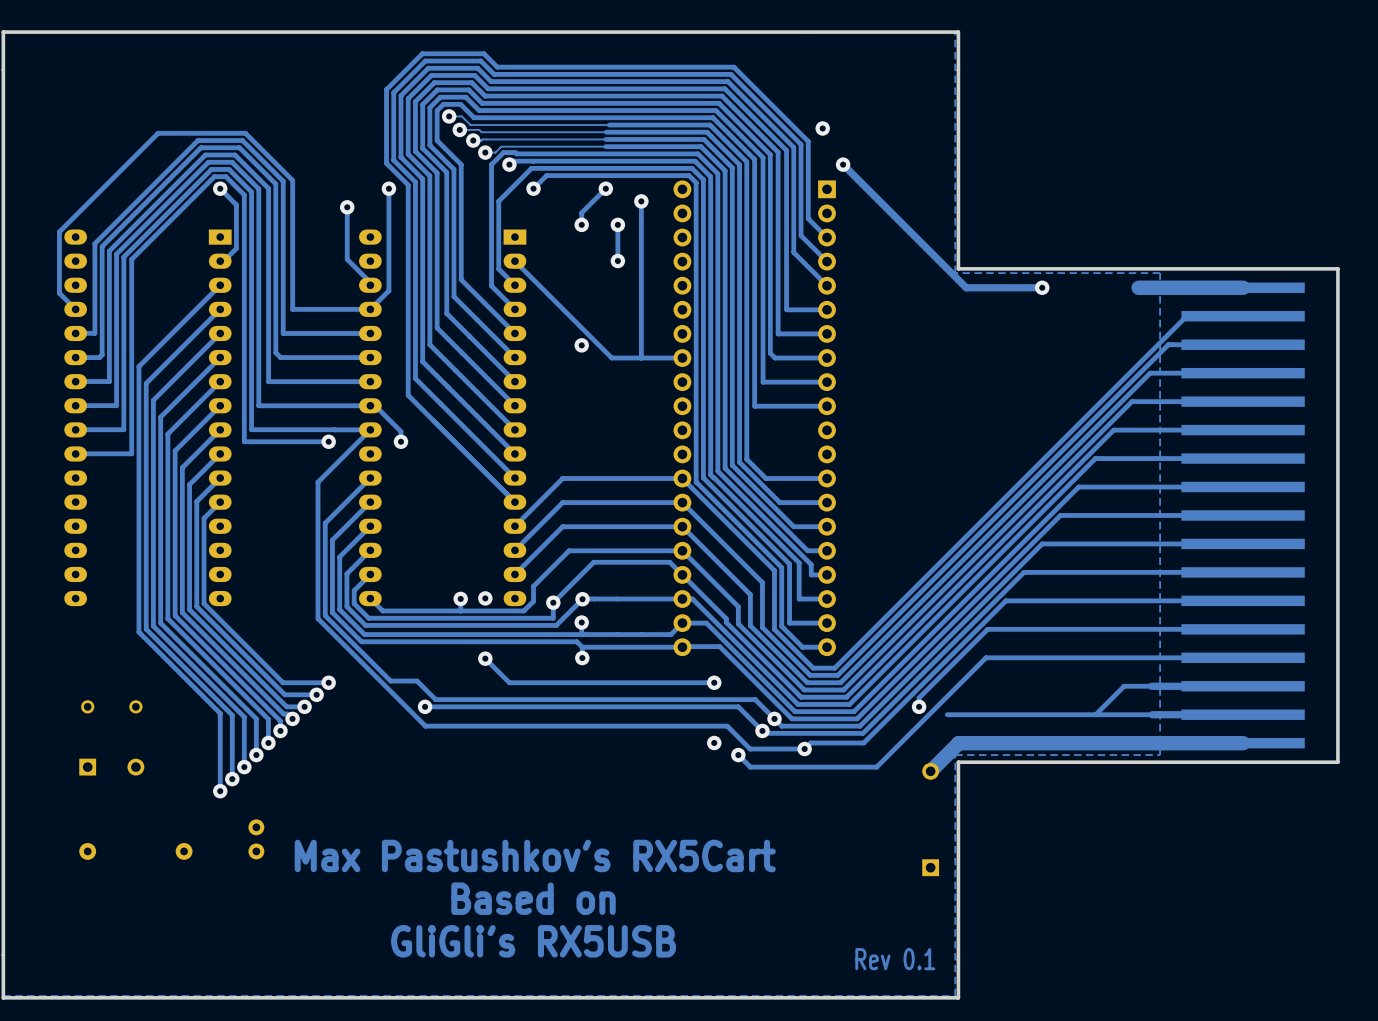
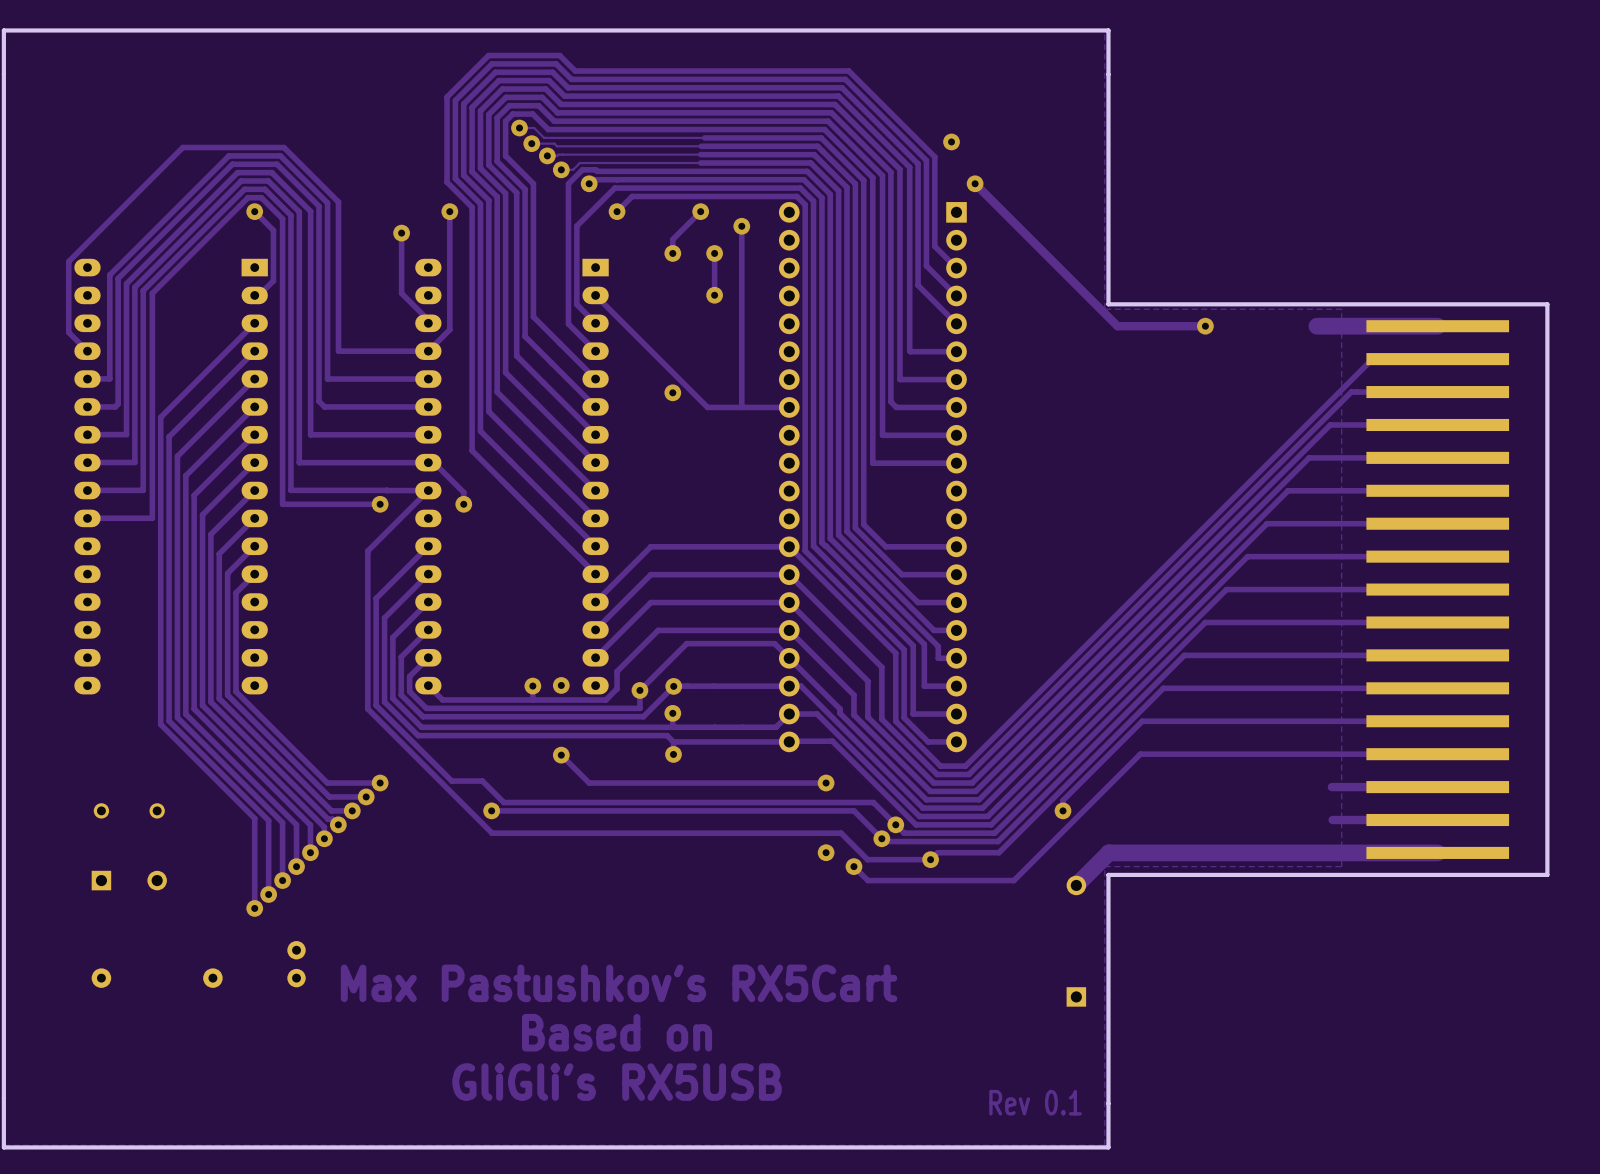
track: (1151, 686) (1124, 686) (1095, 714) -> none
track: (1152, 714) (947, 714) -> none

